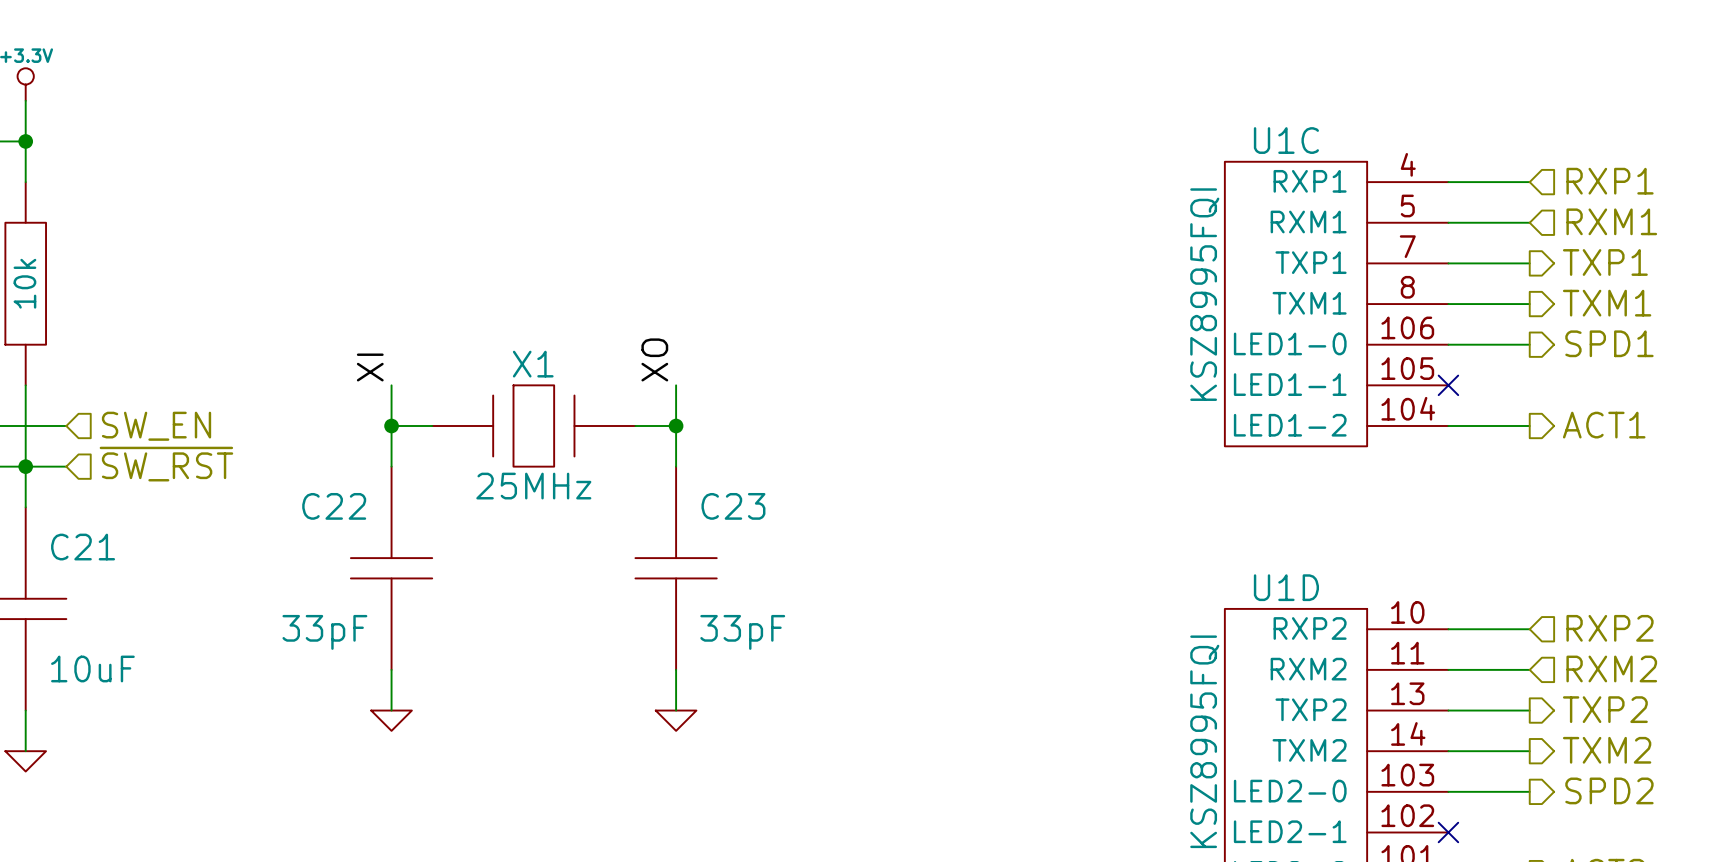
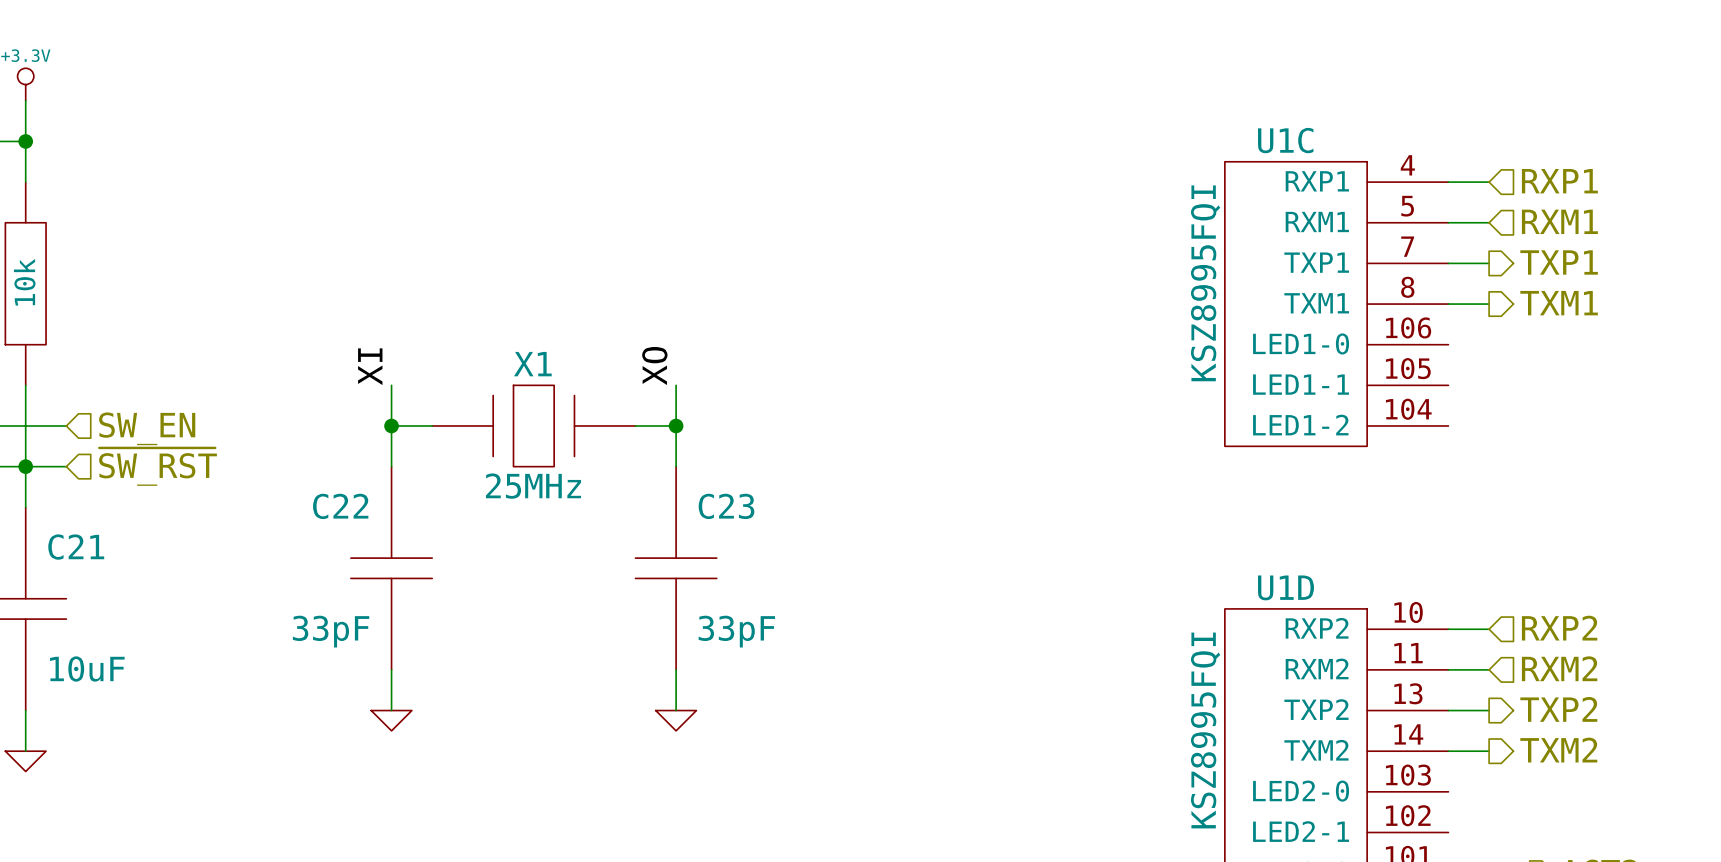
hierarchical label position: RXP1 (1610, 181) -> RXP1 (1559, 181)
wire: (1489, 182) (1529, 182) -> none
hierarchical label position: RXM1 (1611, 221) -> RXM1 (1559, 221)
wire: (1489, 222) (1529, 222) -> none
hierarchical label position: TXP1 (1605, 262) -> TXP1 (1559, 262)
wire: (1489, 263) (1529, 263) -> none
hierarchical label position: TXM1 (1607, 303) -> TXM1 (1559, 303)
wire: (1489, 304) (1529, 304) -> none
hierarchical label: SPD1 (1609, 343) -> none
wire: (1448, 344) (1529, 344) -> none
no-connect mark: (1448, 385) -> none
hierarchical label: ACT1 (1604, 425) -> none
wire: (1448, 426) (1529, 426) -> none
hierarchical label position: RXP2 (1610, 628) -> RXP2 (1559, 628)
wire: (1489, 629) (1529, 629) -> none
hierarchical label position: RXM2 (1611, 668) -> RXM2 (1559, 668)
wire: (1489, 669) (1529, 669) -> none
hierarchical label position: TXP2 (1605, 709) -> TXP2 (1558, 709)
wire: (1489, 710) (1529, 710) -> none
hierarchical label position: TXM2 (1607, 750) -> TXM2 (1558, 750)
wire: (1489, 751) (1529, 751) -> none
hierarchical label: SPD2 (1609, 790) -> none
wire: (1448, 791) (1529, 791) -> none
no-connect mark: (1448, 832) -> none

